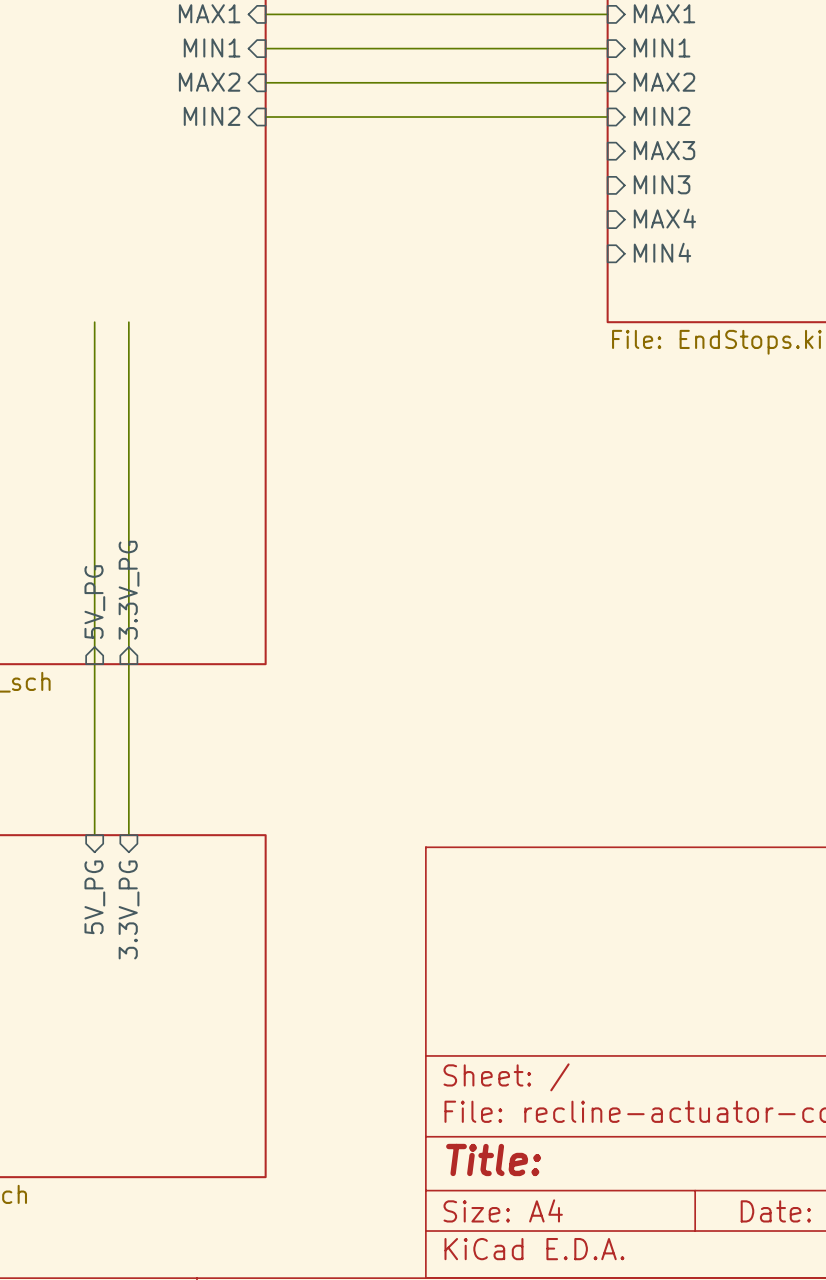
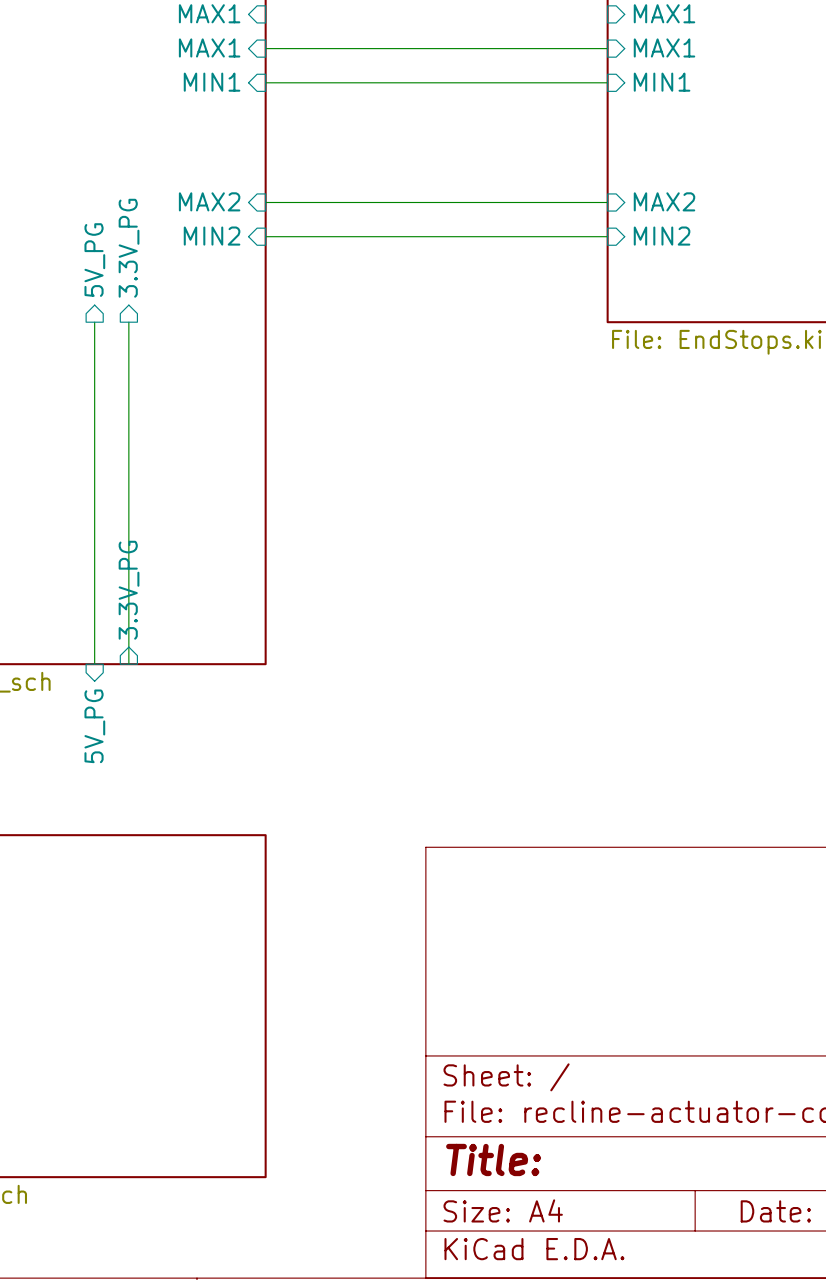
wire: (265, 14) (607, 14) -> (265, 236) (607, 236)
sheet pin: MIN1 (212, 47) -> MAX1 (209, 47)
sheet pin: MIN1 (662, 47) -> MAX1 (664, 47)
sheet pin: MAX2 (209, 82) -> MIN1 (212, 82)
sheet pin: MAX2 (664, 82) -> MIN1 (662, 82)
sheet pin position: MIN2 (212, 116) -> MIN2 (212, 236)
sheet pin position: MIN2 (662, 116) -> MIN2 (662, 236)
wire: (265, 117) (607, 117) -> (265, 202) (607, 202)
sheet pin: MAX3 (664, 150) -> none
sheet pin: MIN3 (662, 184) -> none
sheet pin: none -> MAX2 (209, 201)
sheet pin: MAX4 (664, 218) -> MAX2 (664, 201)
sheet pin: none -> 3.3V_PG (129, 248)
sheet pin: MIN4 (662, 252) -> none
sheet pin: none -> 5V_PG (94, 260)
sheet pin rotation: 0° (94, 602) -> 180° (94, 726)
sheet pin position: 5V_PG (94, 602) -> 5V_PG (94, 726)
wire: (94, 664) (94, 835) -> none
wire: (128, 664) (128, 835) -> none
sheet pin: 5V_PG (94, 897) -> none
sheet pin: 3.3V_PG (129, 909) -> none

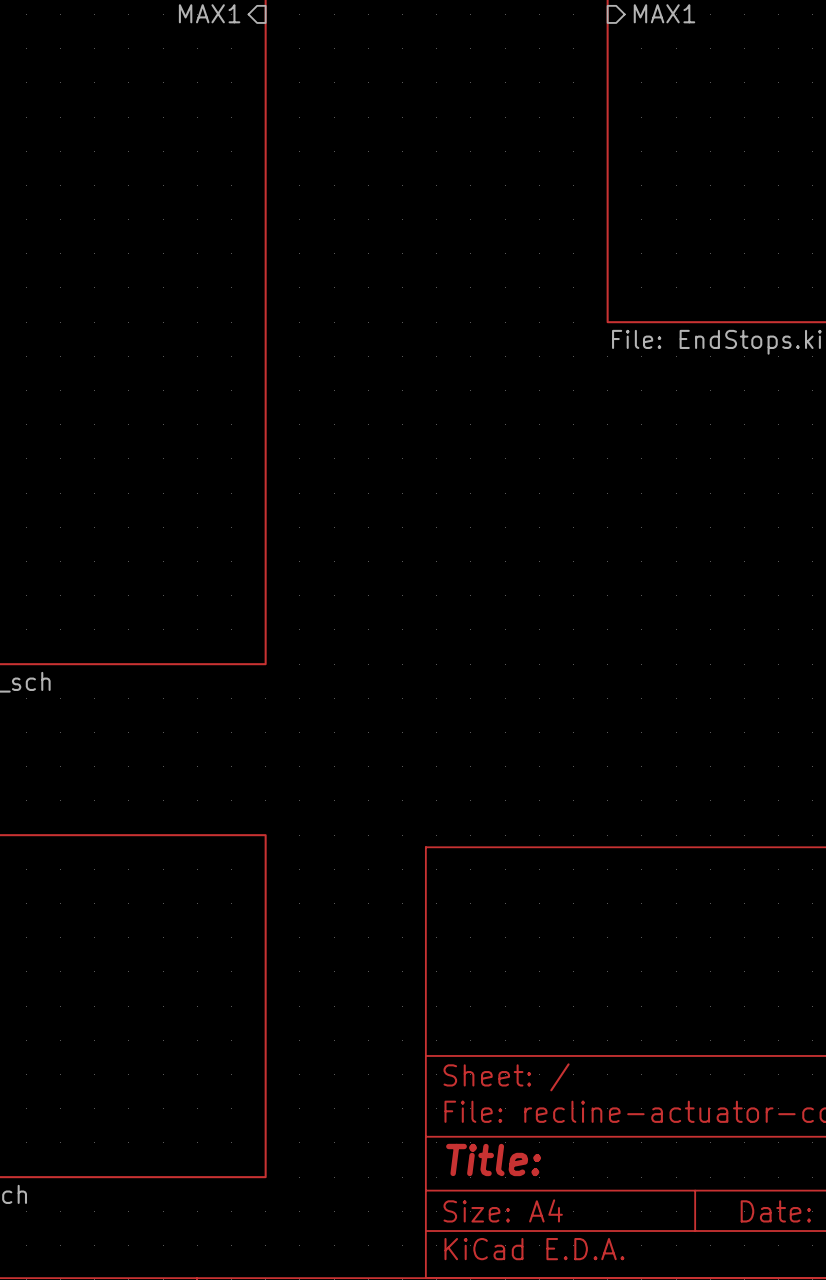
sheet pin: MAX1 (209, 47) -> none
sheet pin: MAX1 (664, 47) -> none
wire: (265, 48) (607, 48) -> none
sheet pin: MIN1 (212, 82) -> none
wire: (265, 82) (607, 82) -> none
sheet pin: MIN1 (662, 82) -> none
sheet pin: MAX2 (209, 201) -> none
sheet pin: MAX2 (664, 201) -> none
wire: (265, 202) (607, 202) -> none
sheet pin: MIN2 (212, 236) -> none
wire: (265, 236) (607, 236) -> none
sheet pin: MIN2 (662, 236) -> none
sheet pin: 3.3V_PG (129, 248) -> none
sheet pin: 5V_PG (94, 260) -> none
wire: (94, 322) (94, 664) -> none
wire: (128, 322) (128, 664) -> none
sheet pin: 3.3V_PG (129, 590) -> none
sheet pin: 5V_PG (94, 726) -> none

